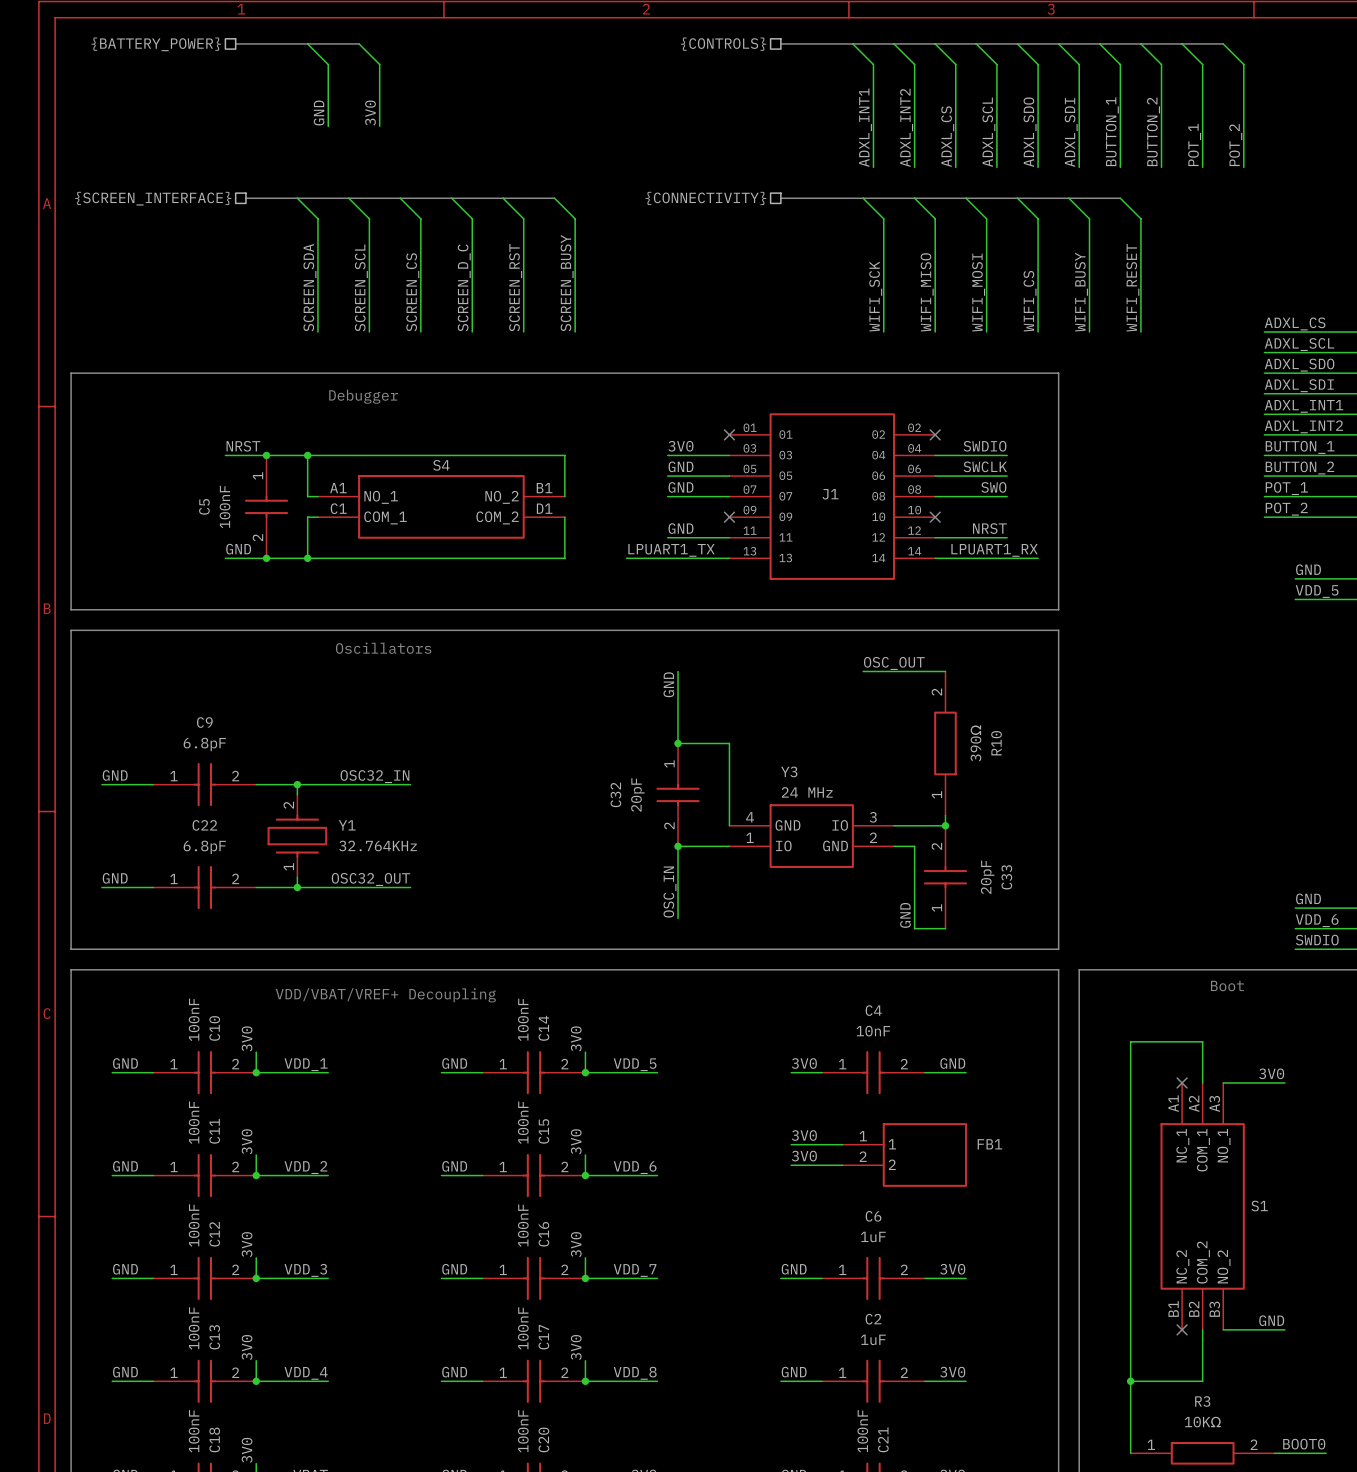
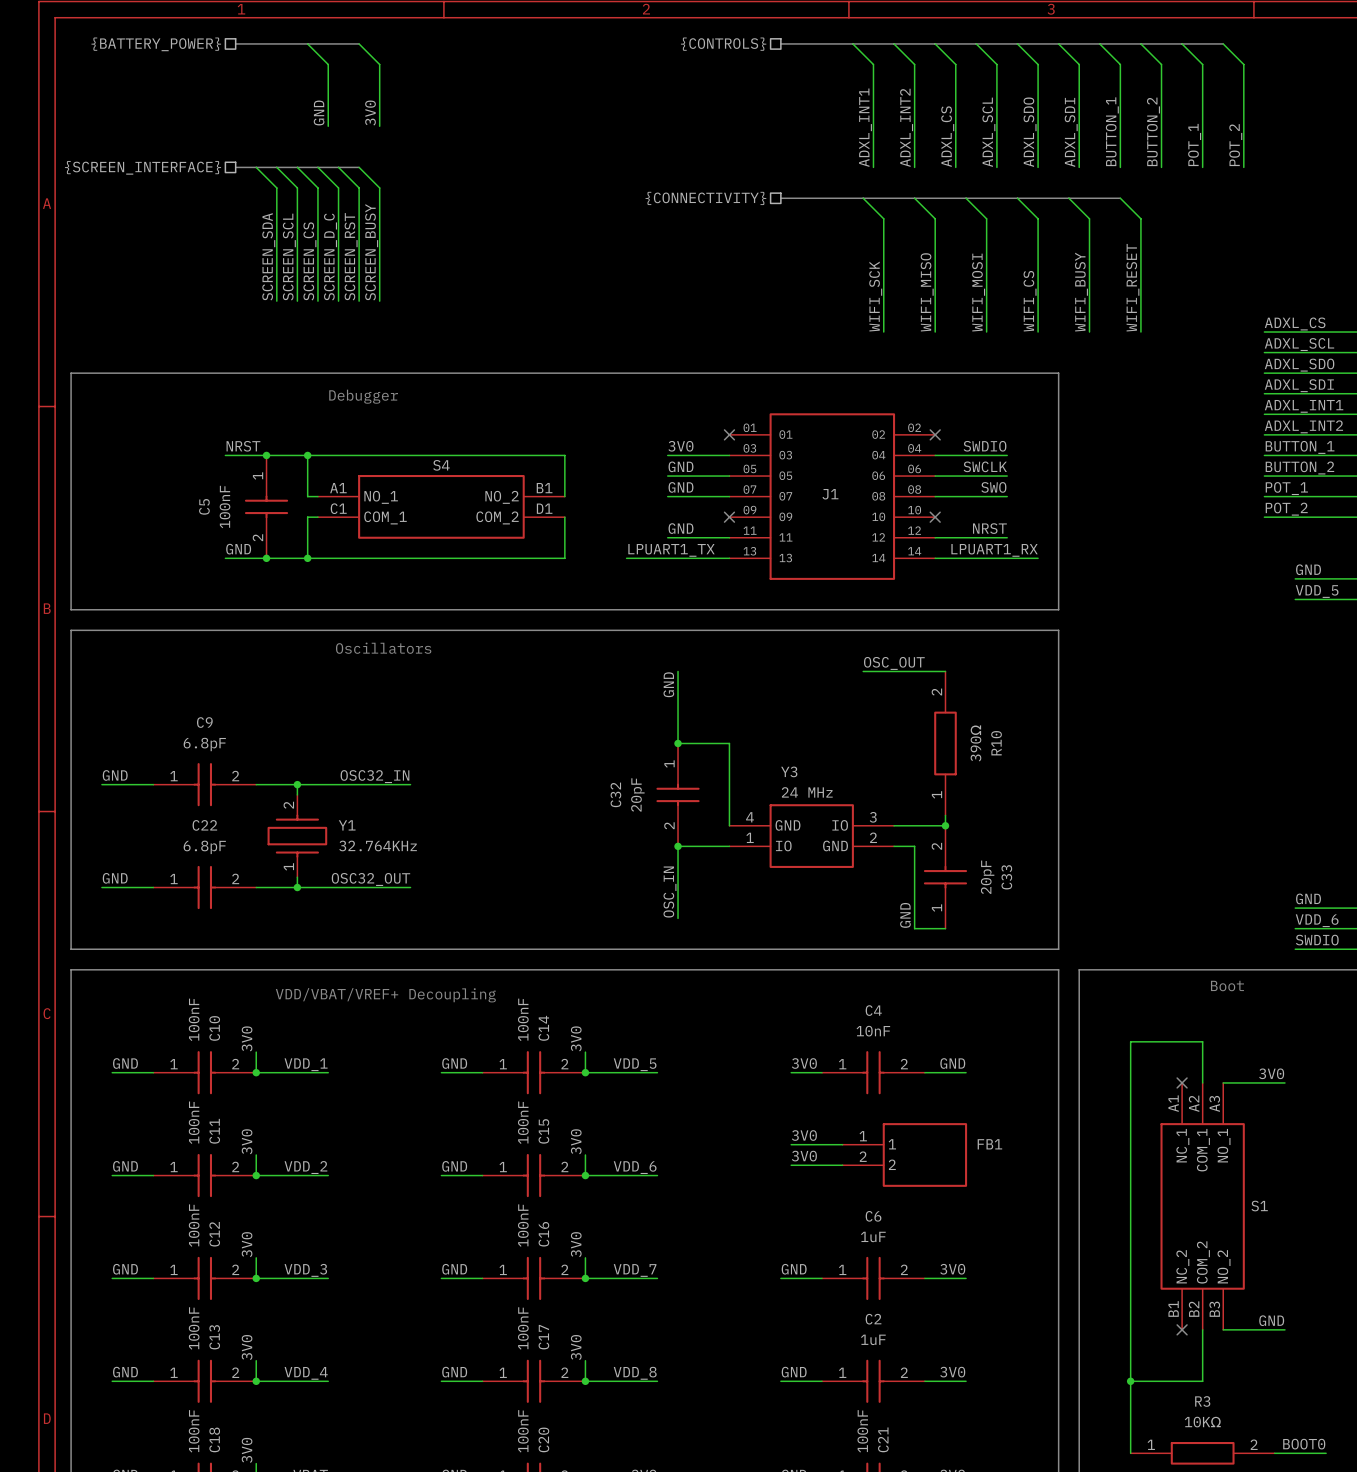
bus: none -> (235, 167) (359, 167)
wire: none -> (276, 167) (297, 187) (297, 301)
hierarchical label position: {SCREEN_INTERFACE} (153, 198) -> {SCREEN_INTERFACE} (143, 167)
bus: (245, 198) (554, 198) -> none
wire: (297, 198) (317, 218) -> (297, 167) (317, 187) (317, 218)
wire: (348, 198) (369, 218) (369, 332) -> (256, 167) (276, 187) (276, 301)
wire: (400, 198) (420, 218) (420, 332) -> (338, 167) (359, 187) (359, 301)
wire: (451, 198) (472, 218) (472, 332) -> (359, 167) (379, 187) (379, 301)
wire: (503, 198) (523, 218) (523, 332) -> (317, 167) (338, 187) (338, 301)
wire: (554, 198) (575, 218) (575, 332) -> none
label position: SCREEN_BUSY (567, 283) -> SCREEN_BUSY (371, 252)
label position: SCREEN_SDA (309, 287) -> SCREEN_SDA (268, 256)
label position: SCREEN_SCL (361, 287) -> SCREEN_SCL (289, 257)
label position: SCREEN_D_C (464, 287) -> SCREEN_D_C (330, 257)
label position: SCREEN_RST (515, 287) -> SCREEN_RST (351, 256)
label position: SCREEN_CS (412, 292) -> SCREEN_CS (309, 261)
wire: (317, 301) (317, 332) -> none

